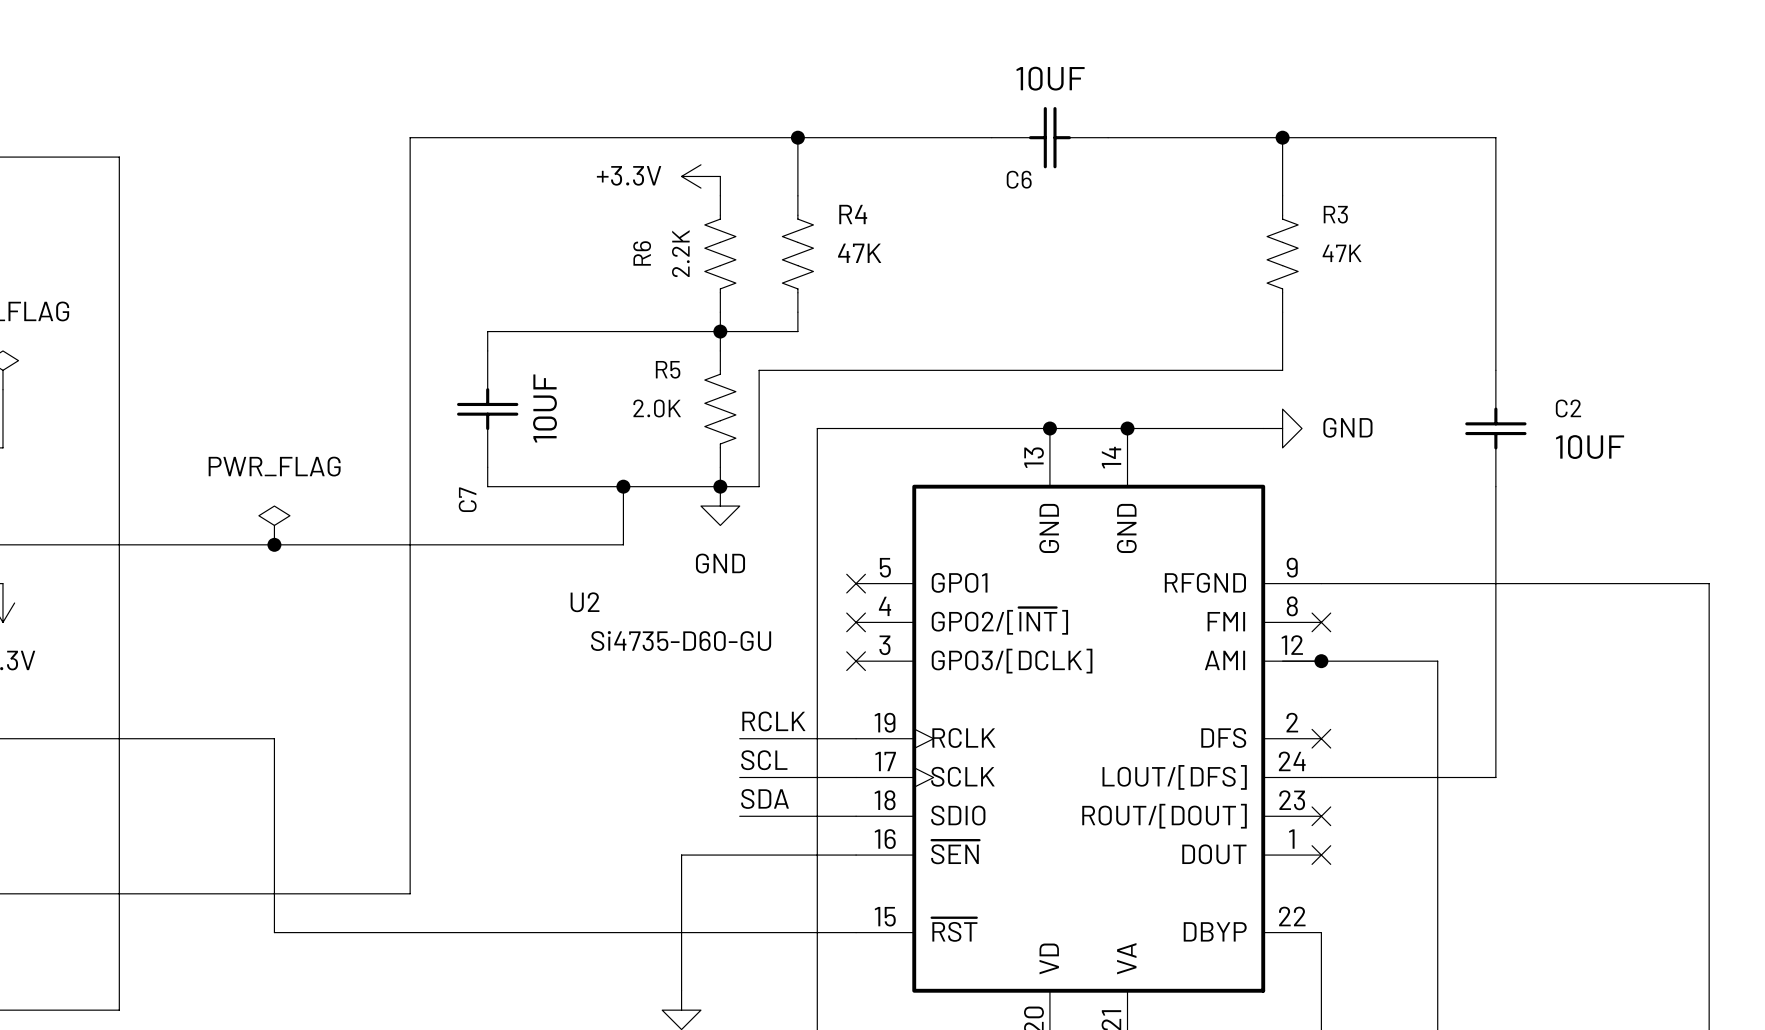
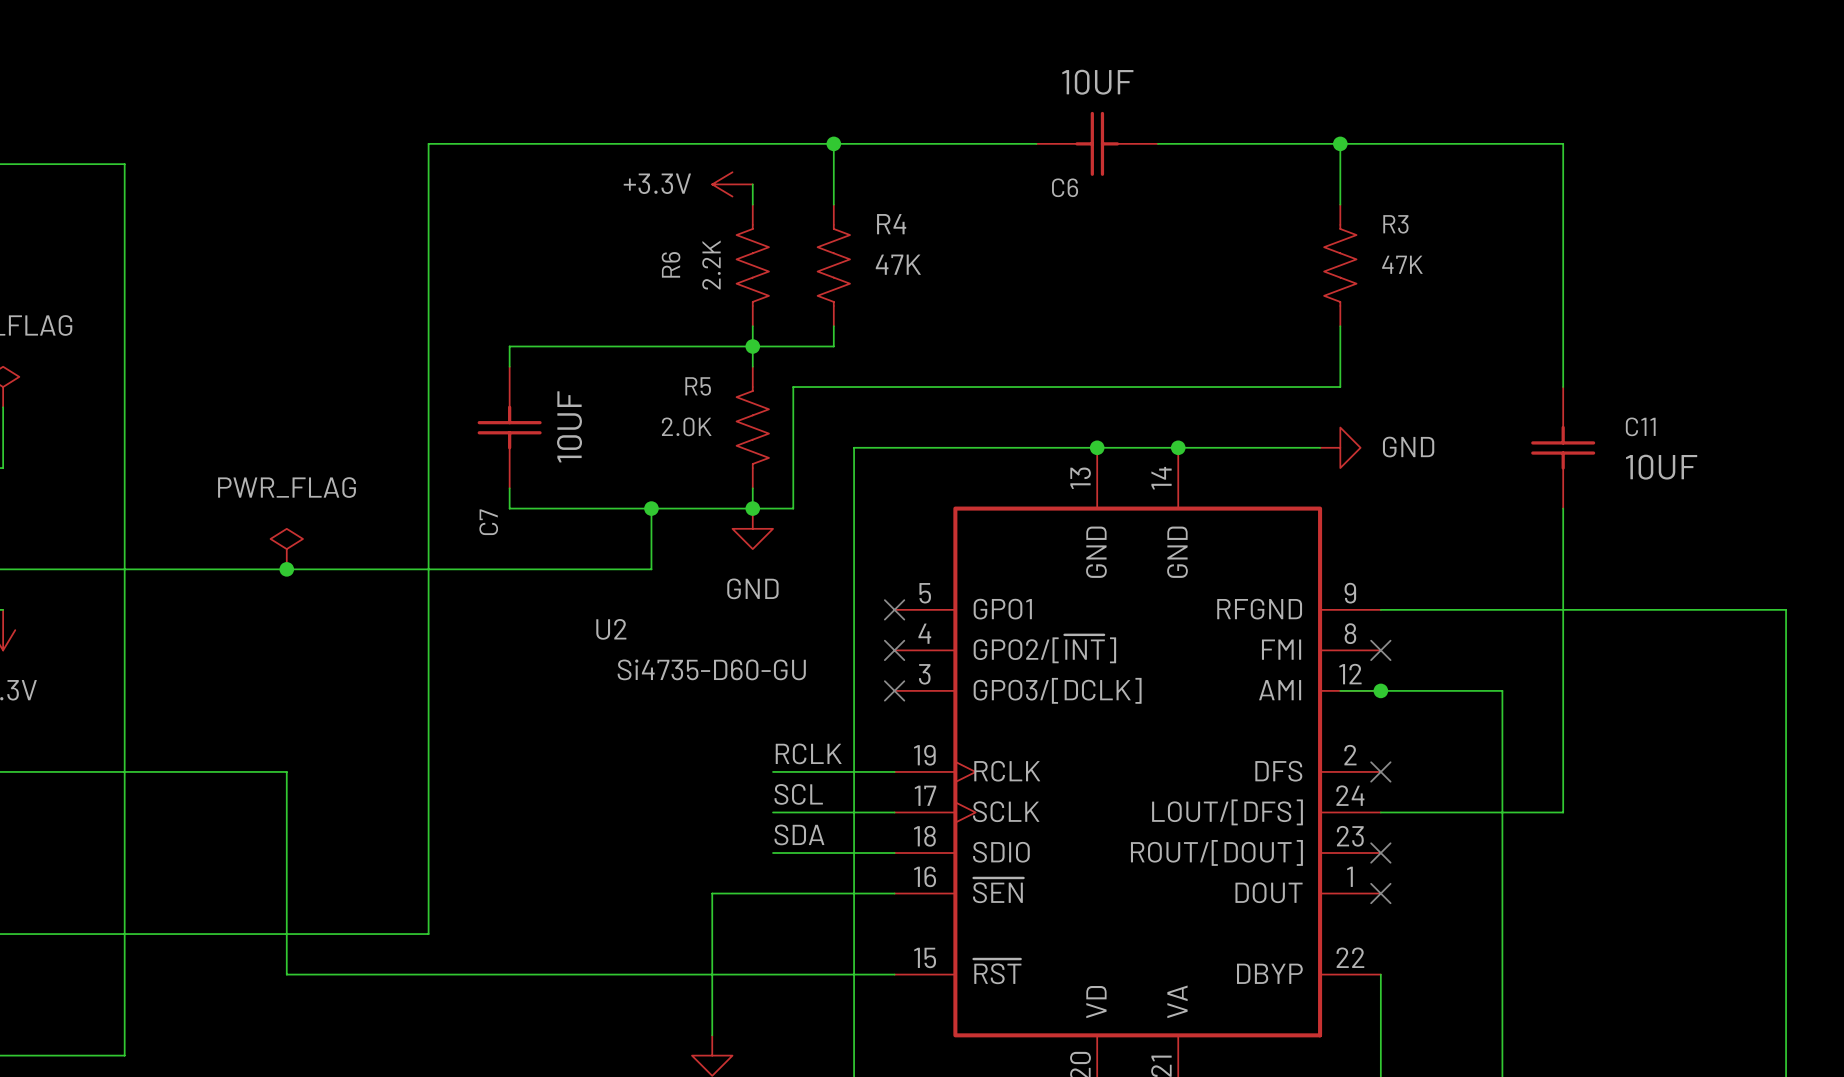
C2 name: C2 (1568, 408) -> C11 (1640, 426)

